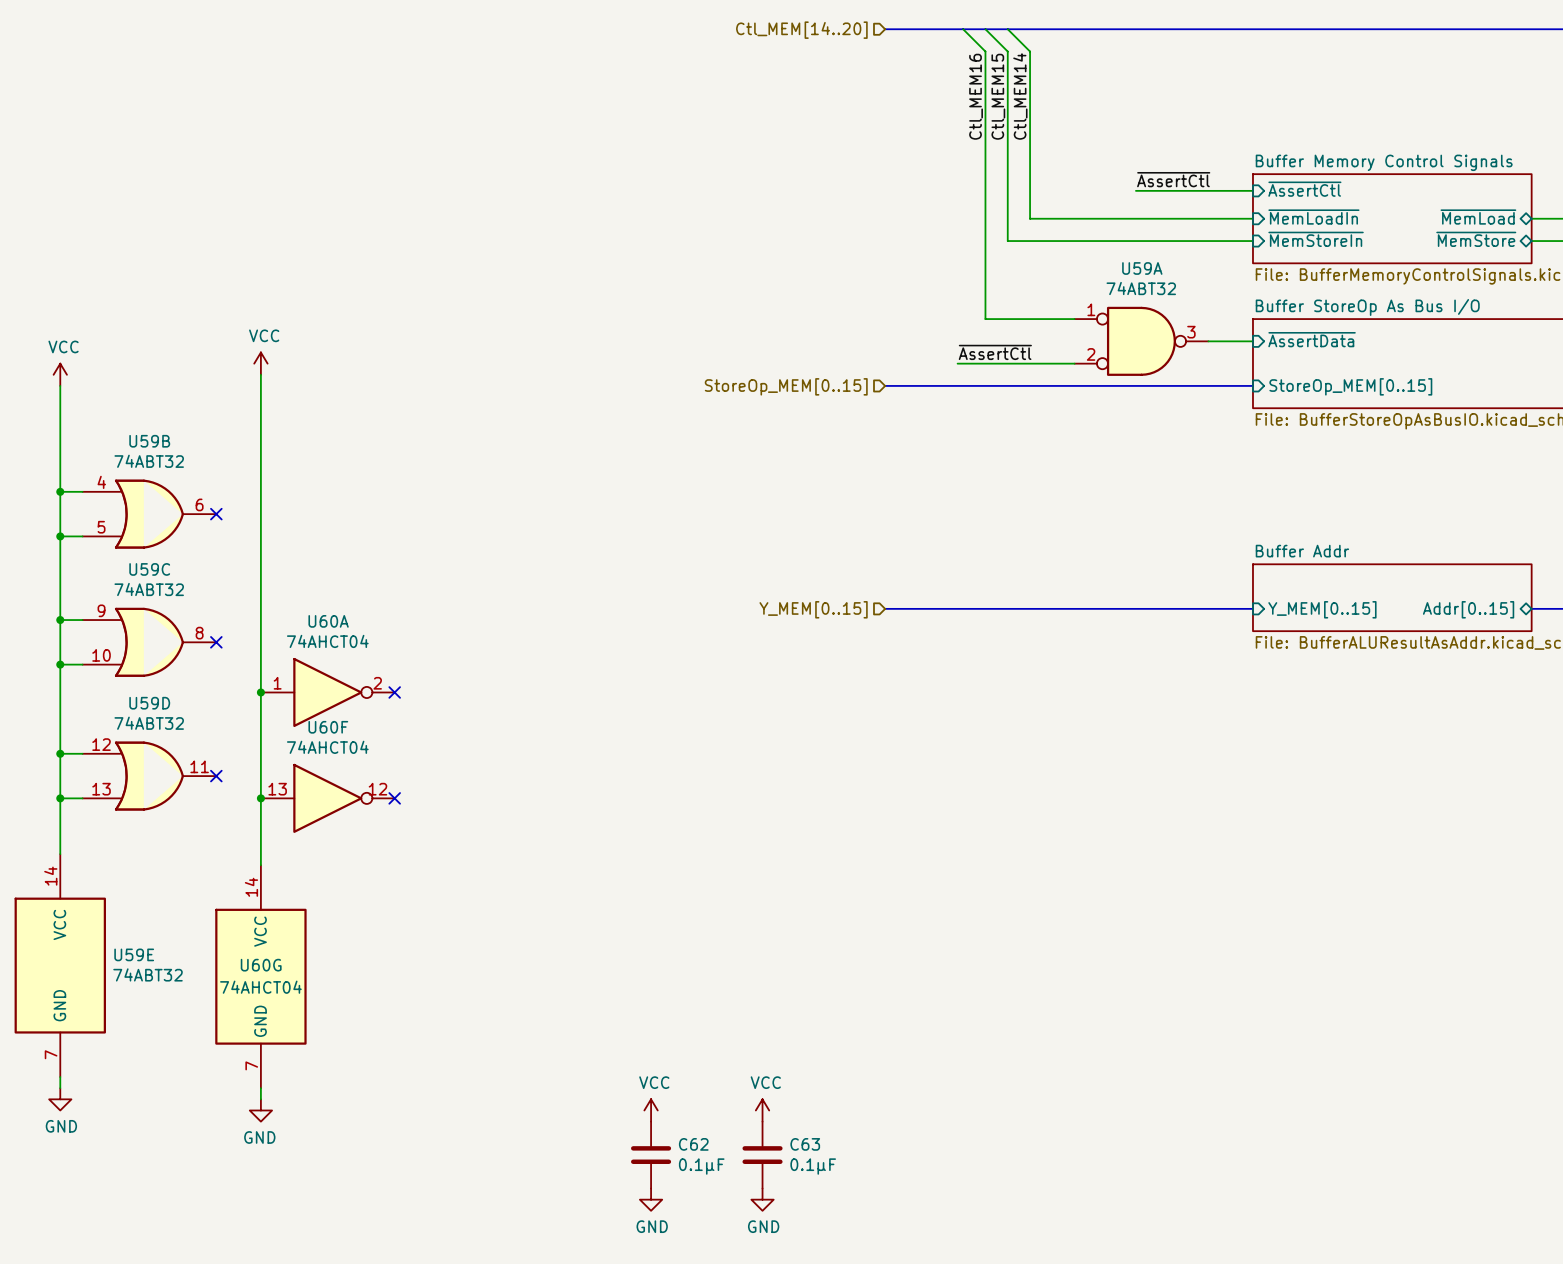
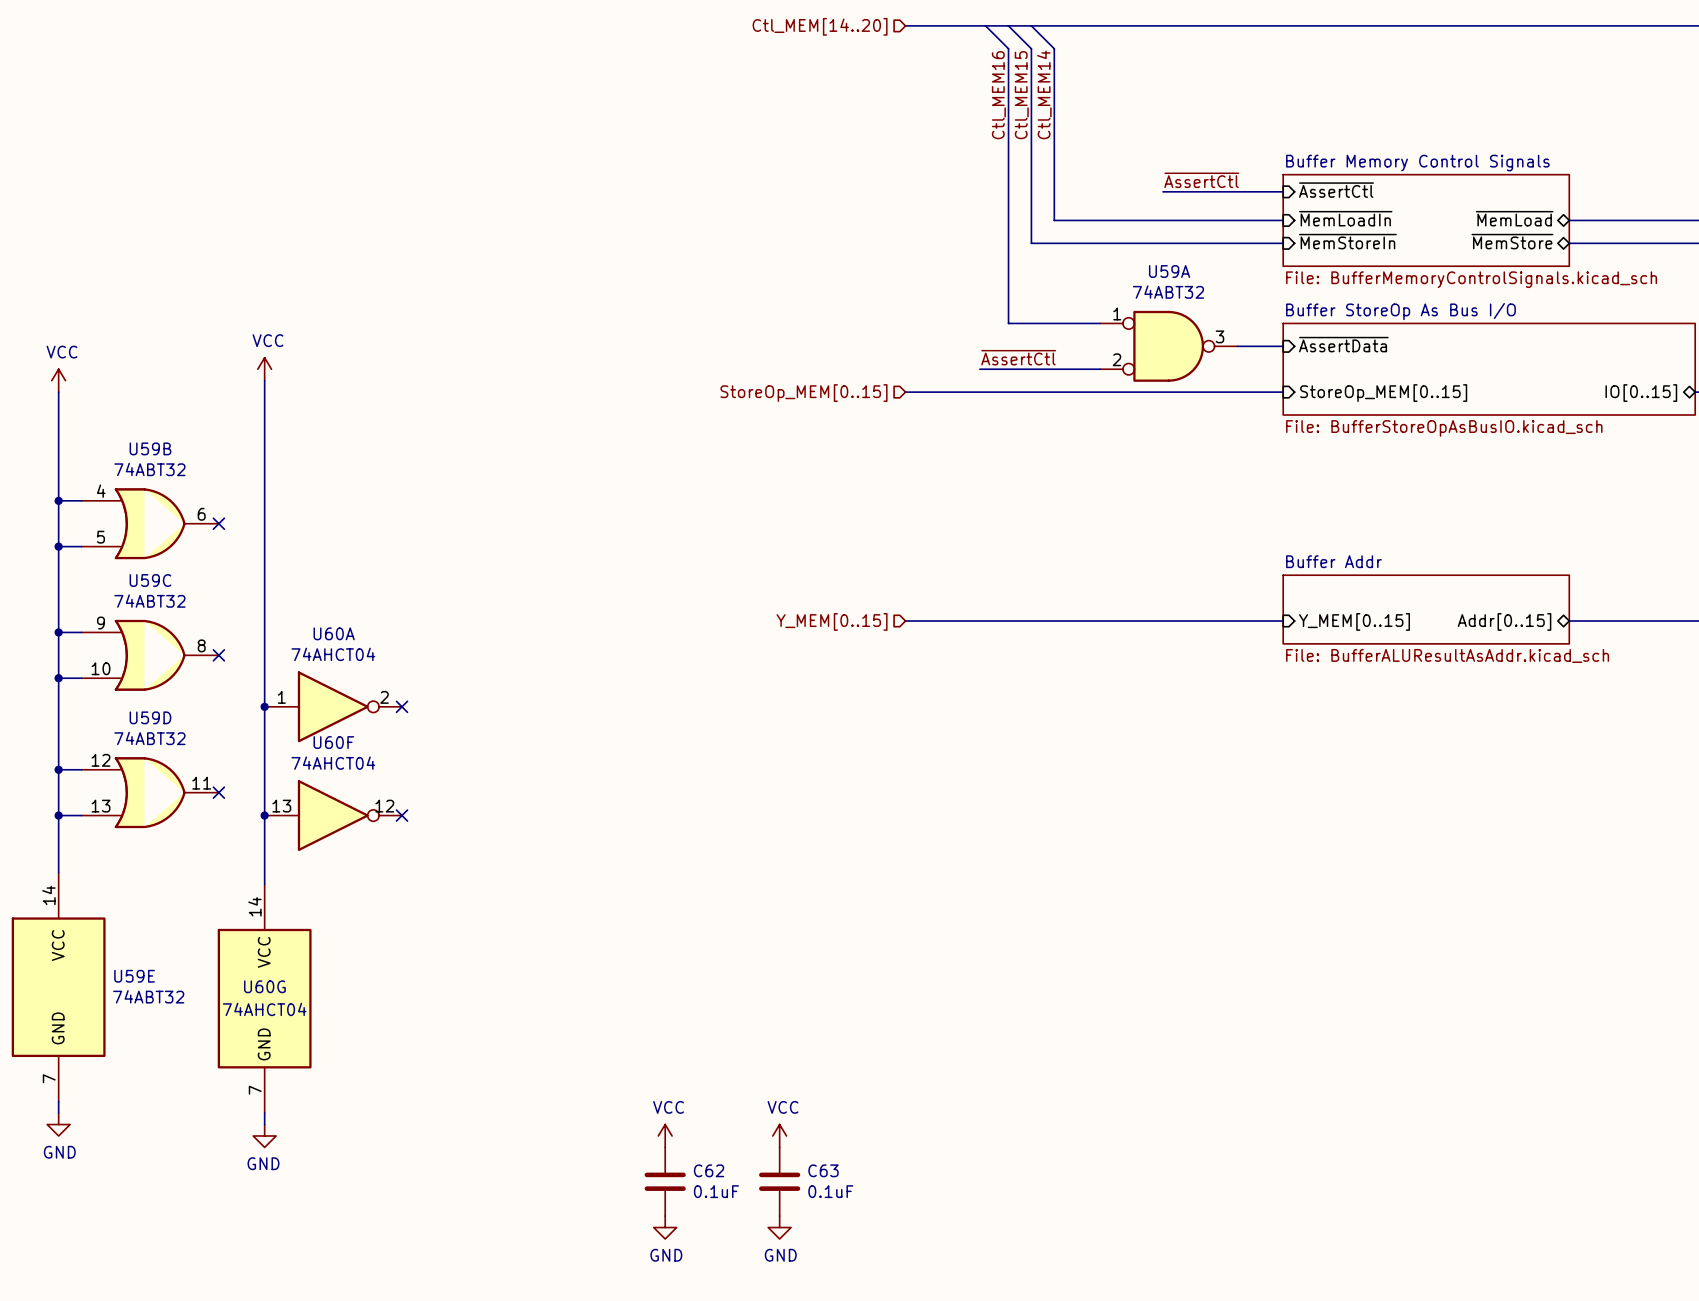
C62 value: 0.1μF (701, 1166) -> 0.1uF (716, 1191)
C63 value: 0.1μF (813, 1166) -> 0.1uF (830, 1191)

